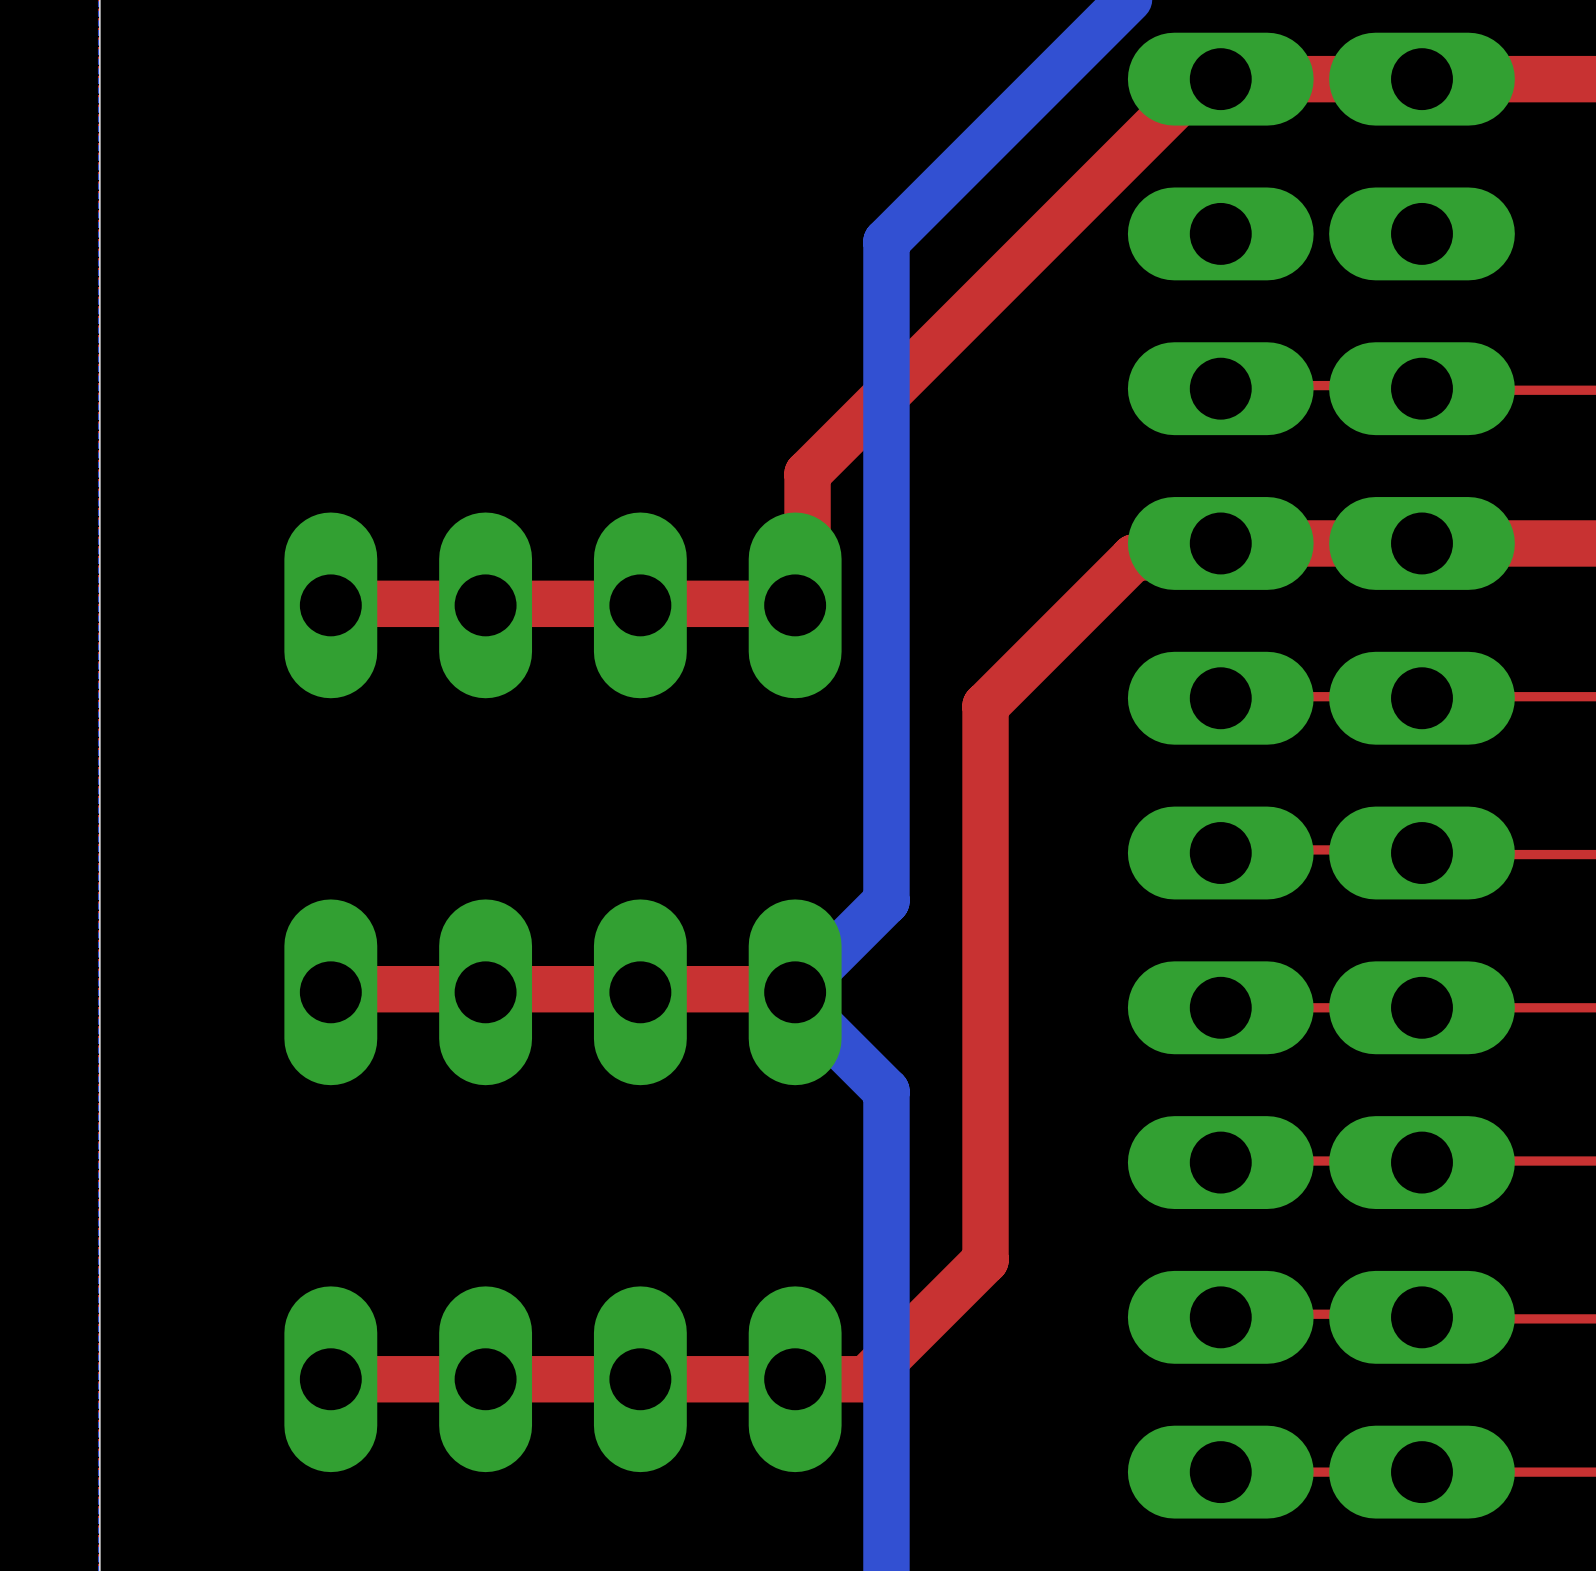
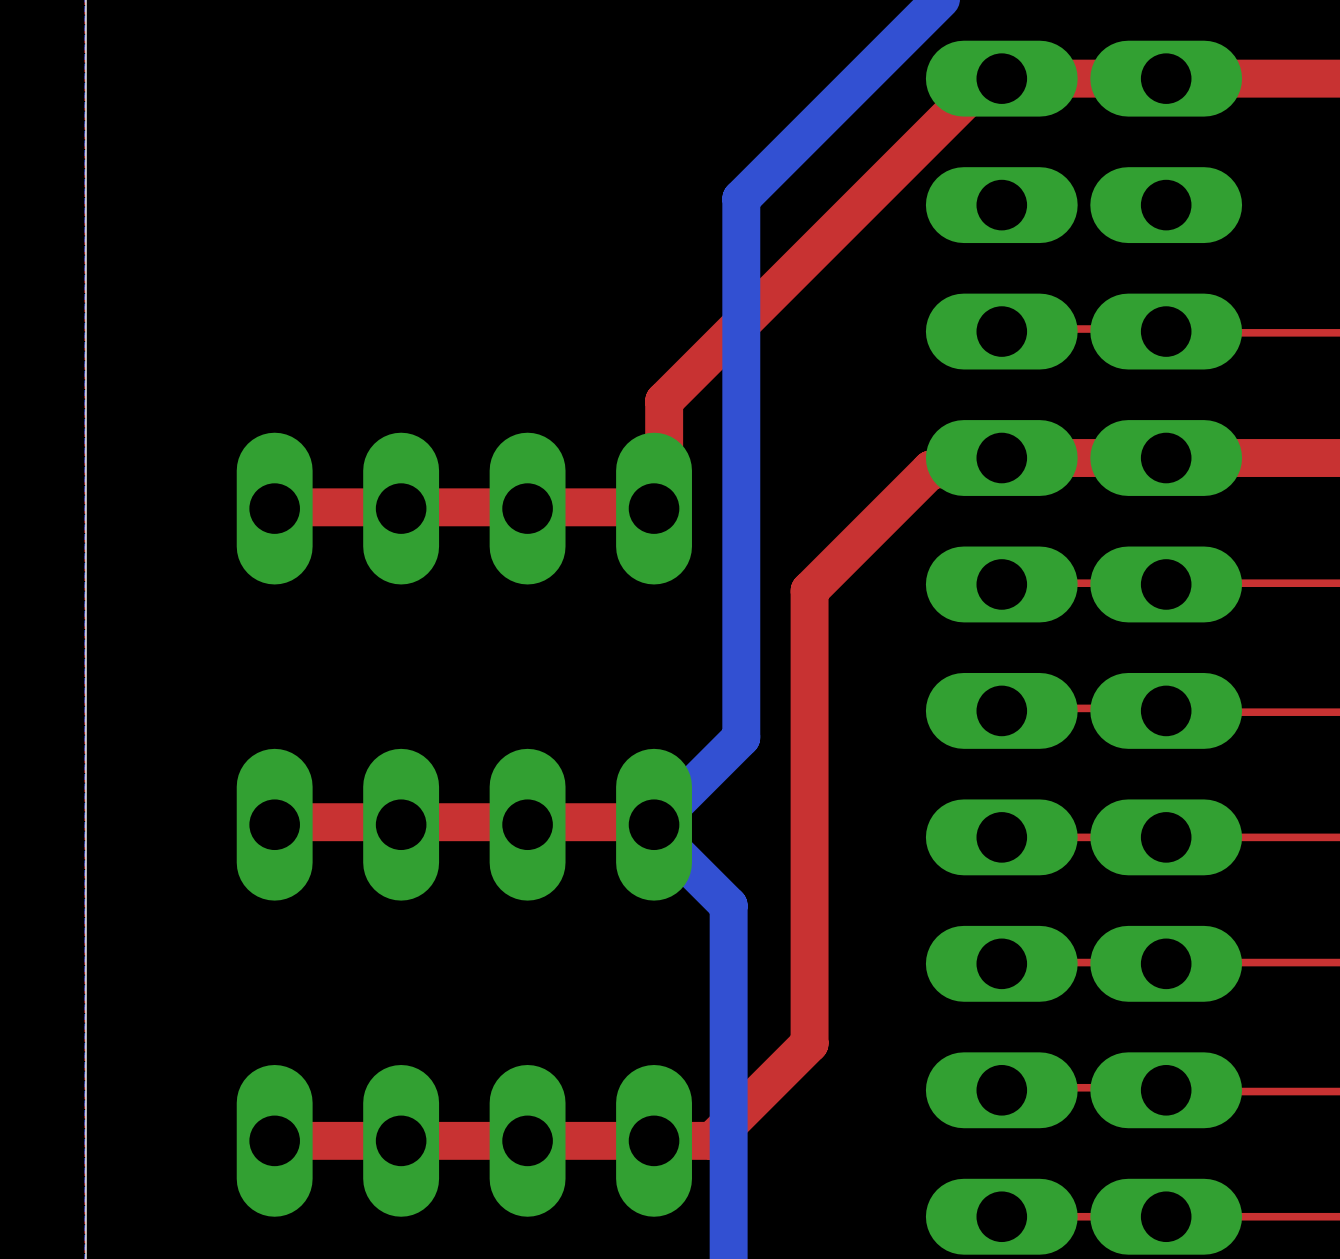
bottom track: (901, 226) (886, 241) (886, 900) -> (741, 198) (741, 737) (728, 750)

